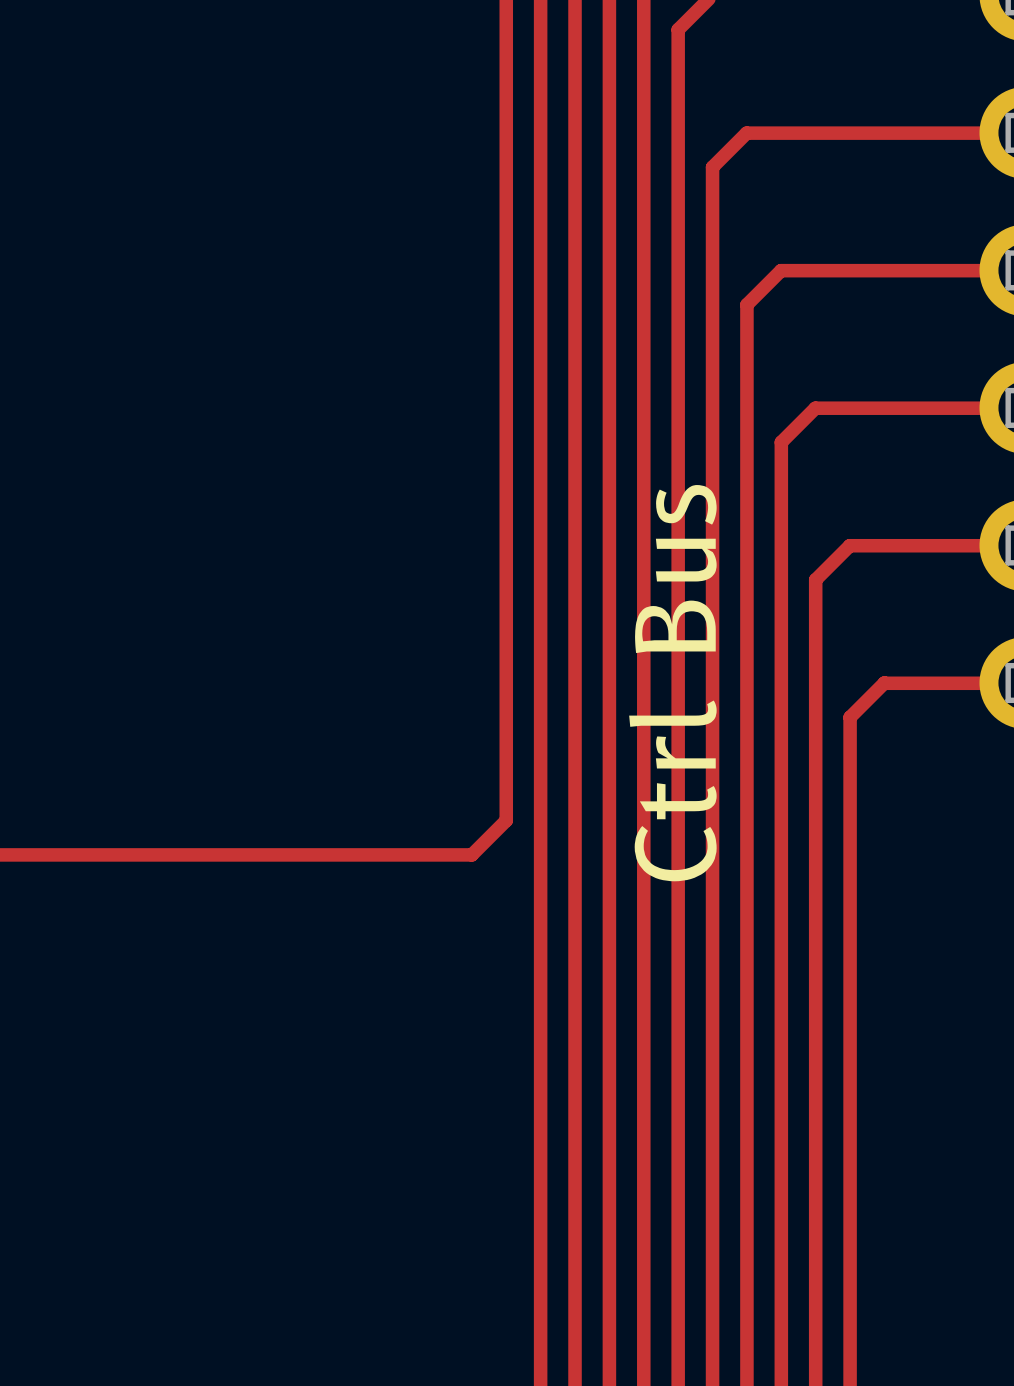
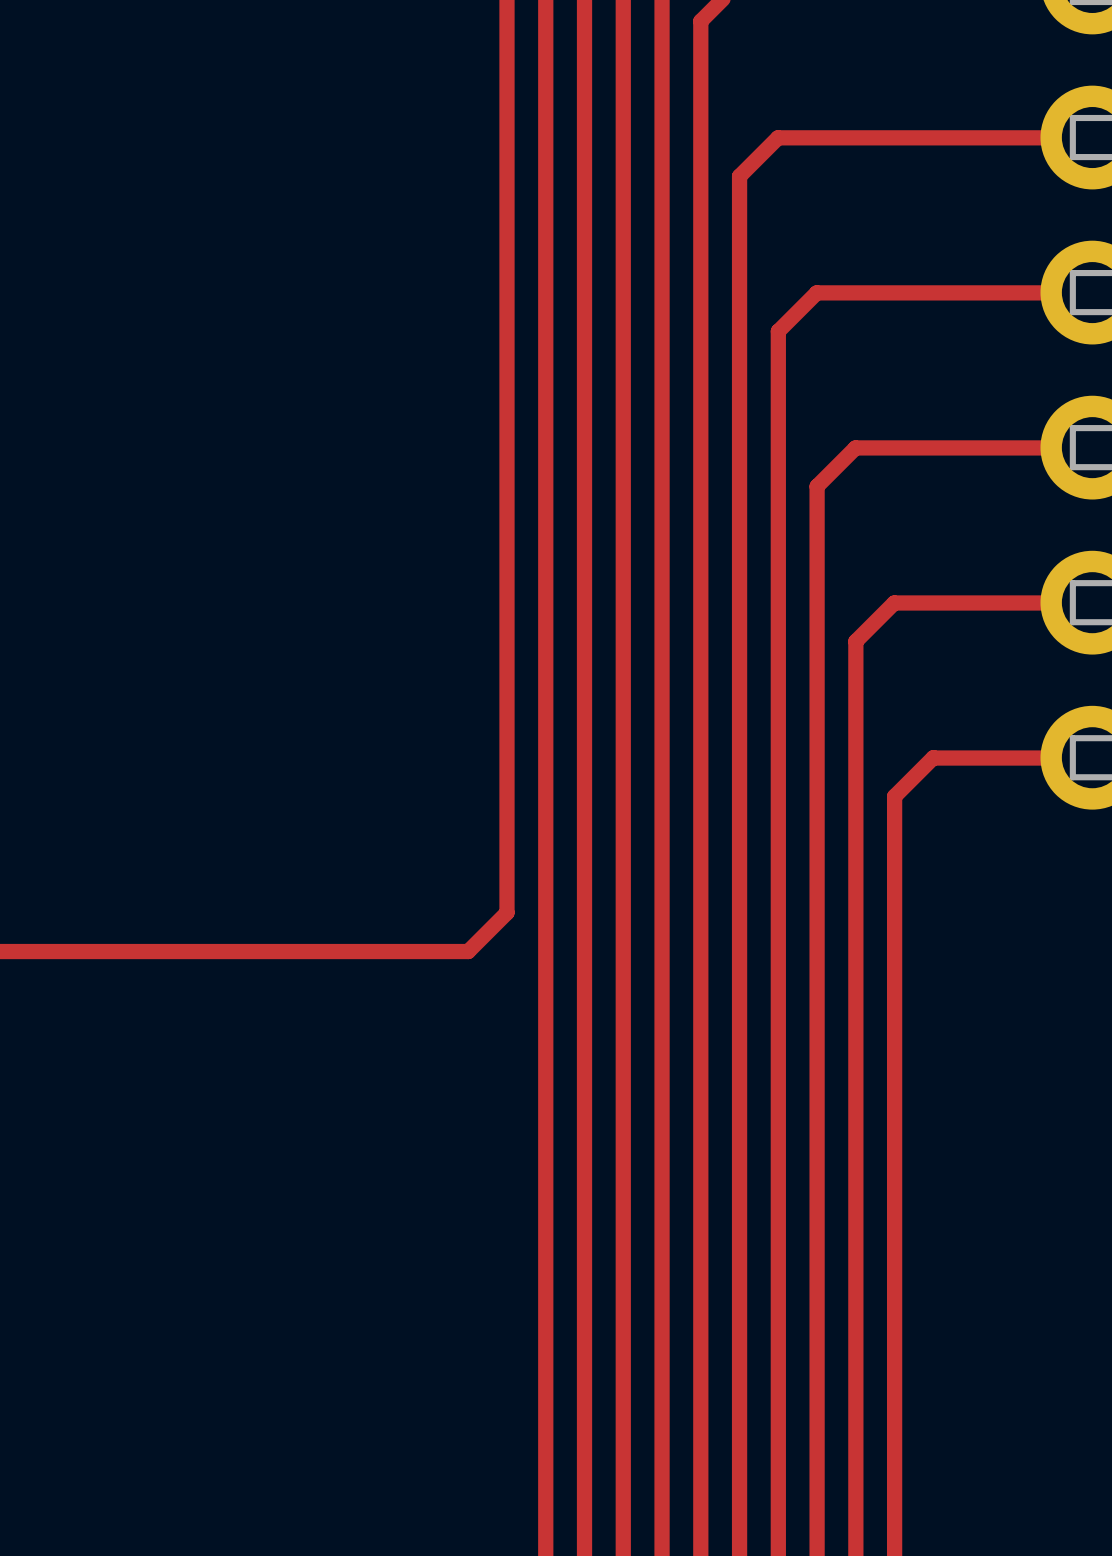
text: Ctrl Bus (672, 683) -> none

